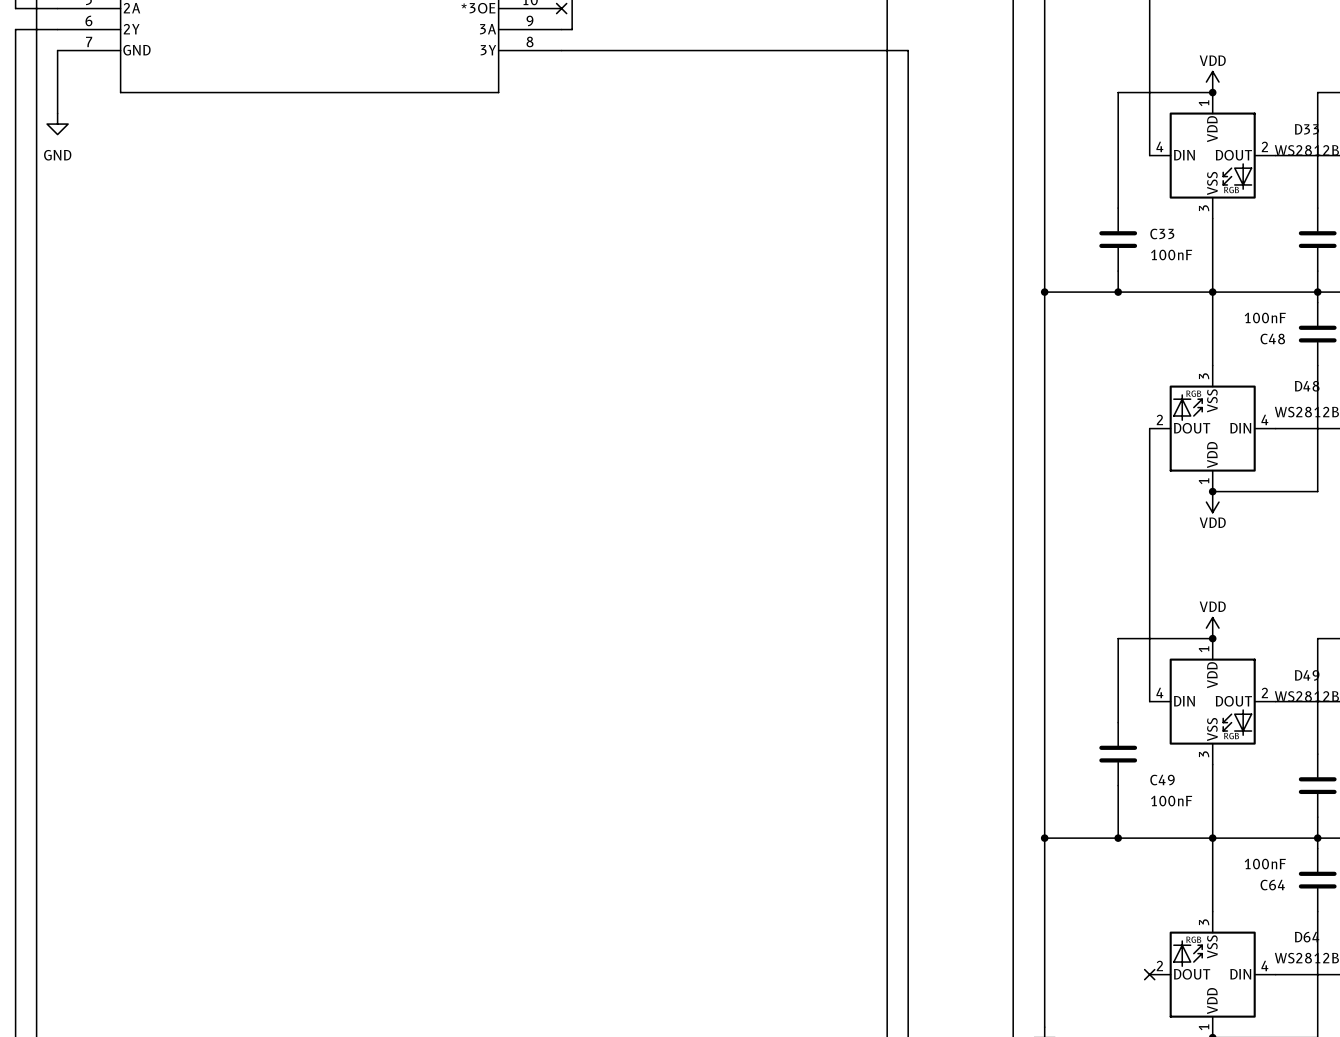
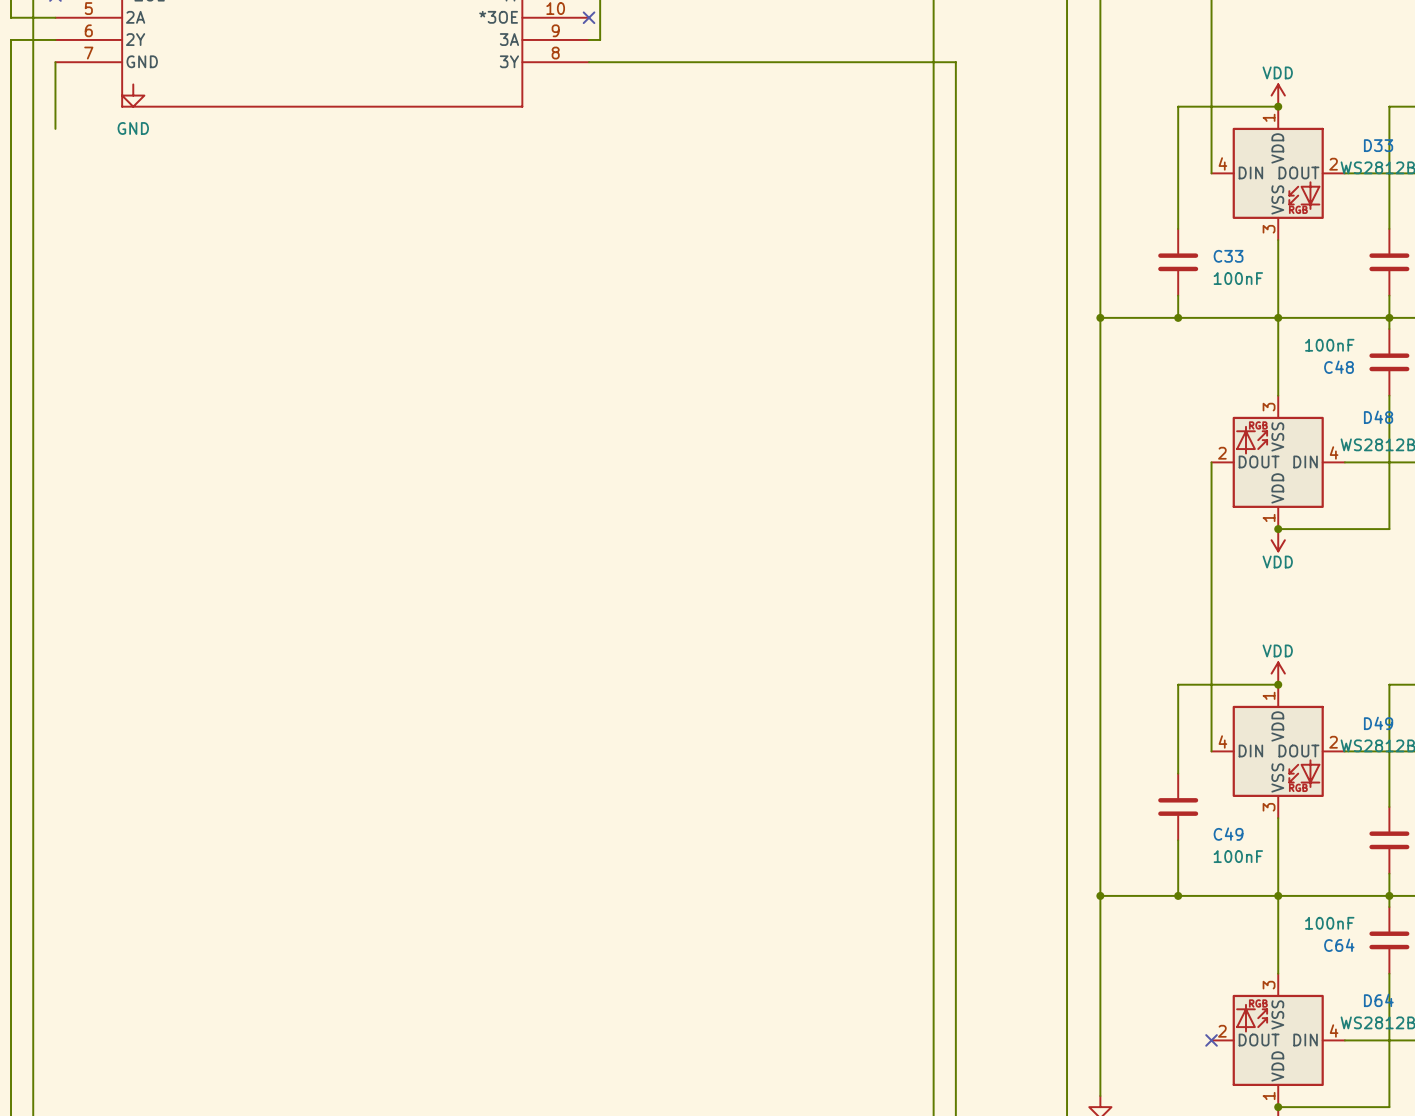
power symbol position: GND (57, 124) -> GND (133, 95)

